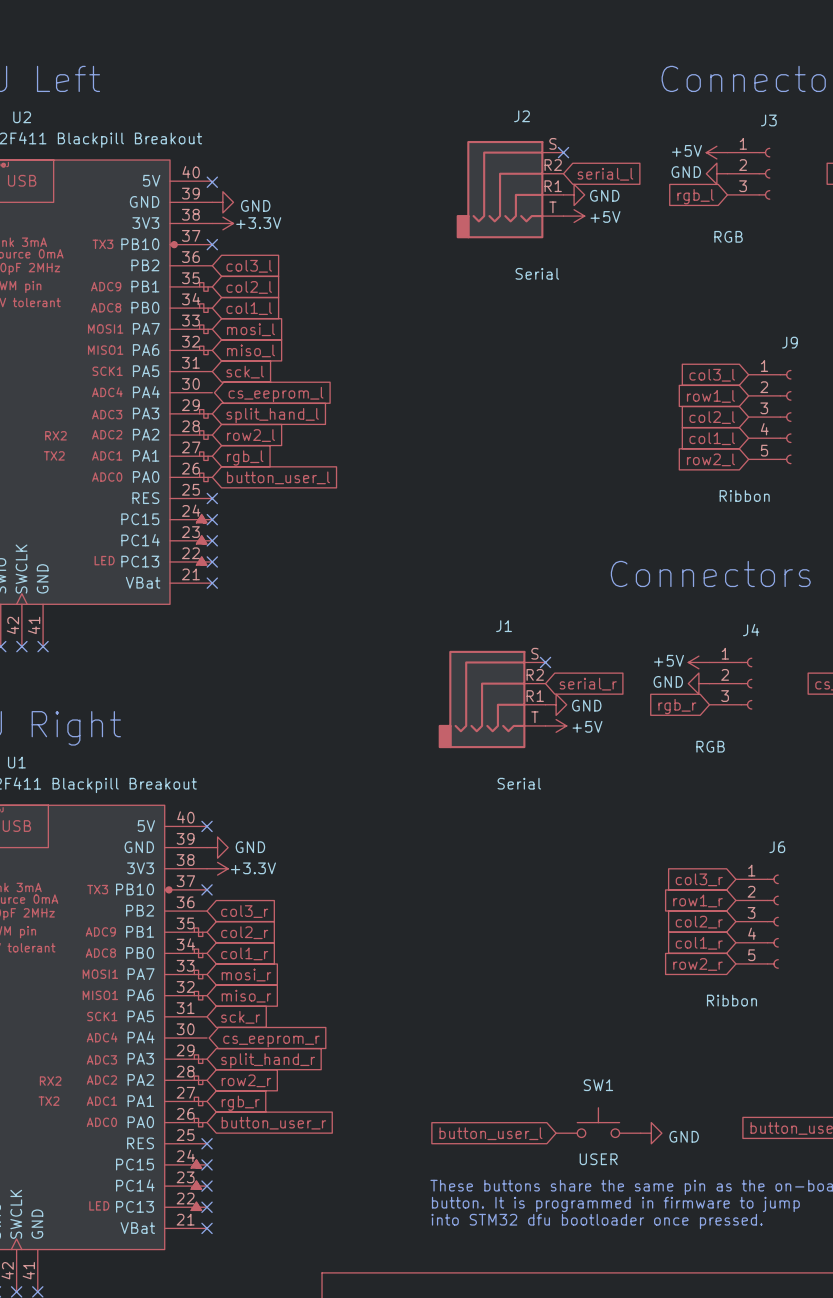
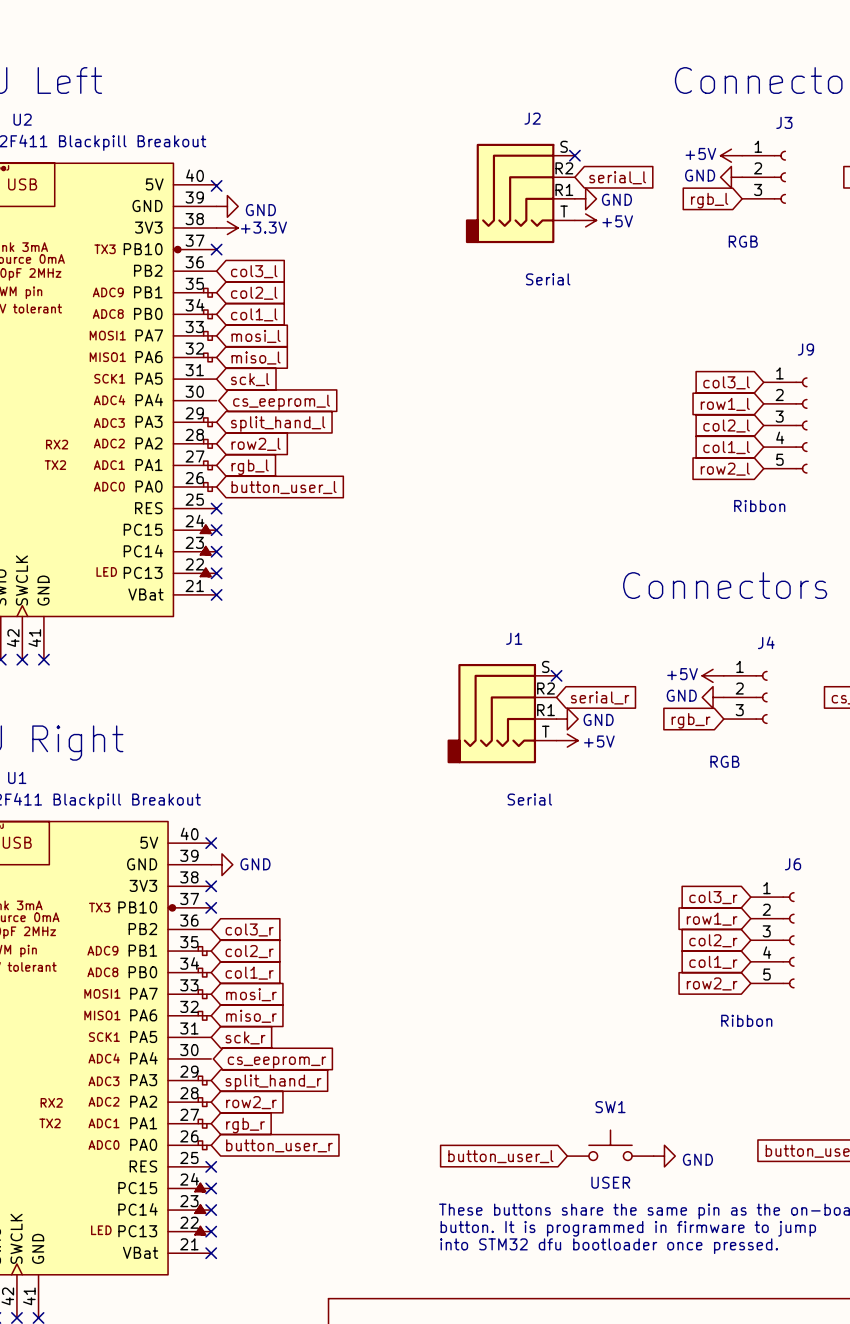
no-connect mark: none -> (211, 886)
power symbol: +3.3V (217, 868) -> none

